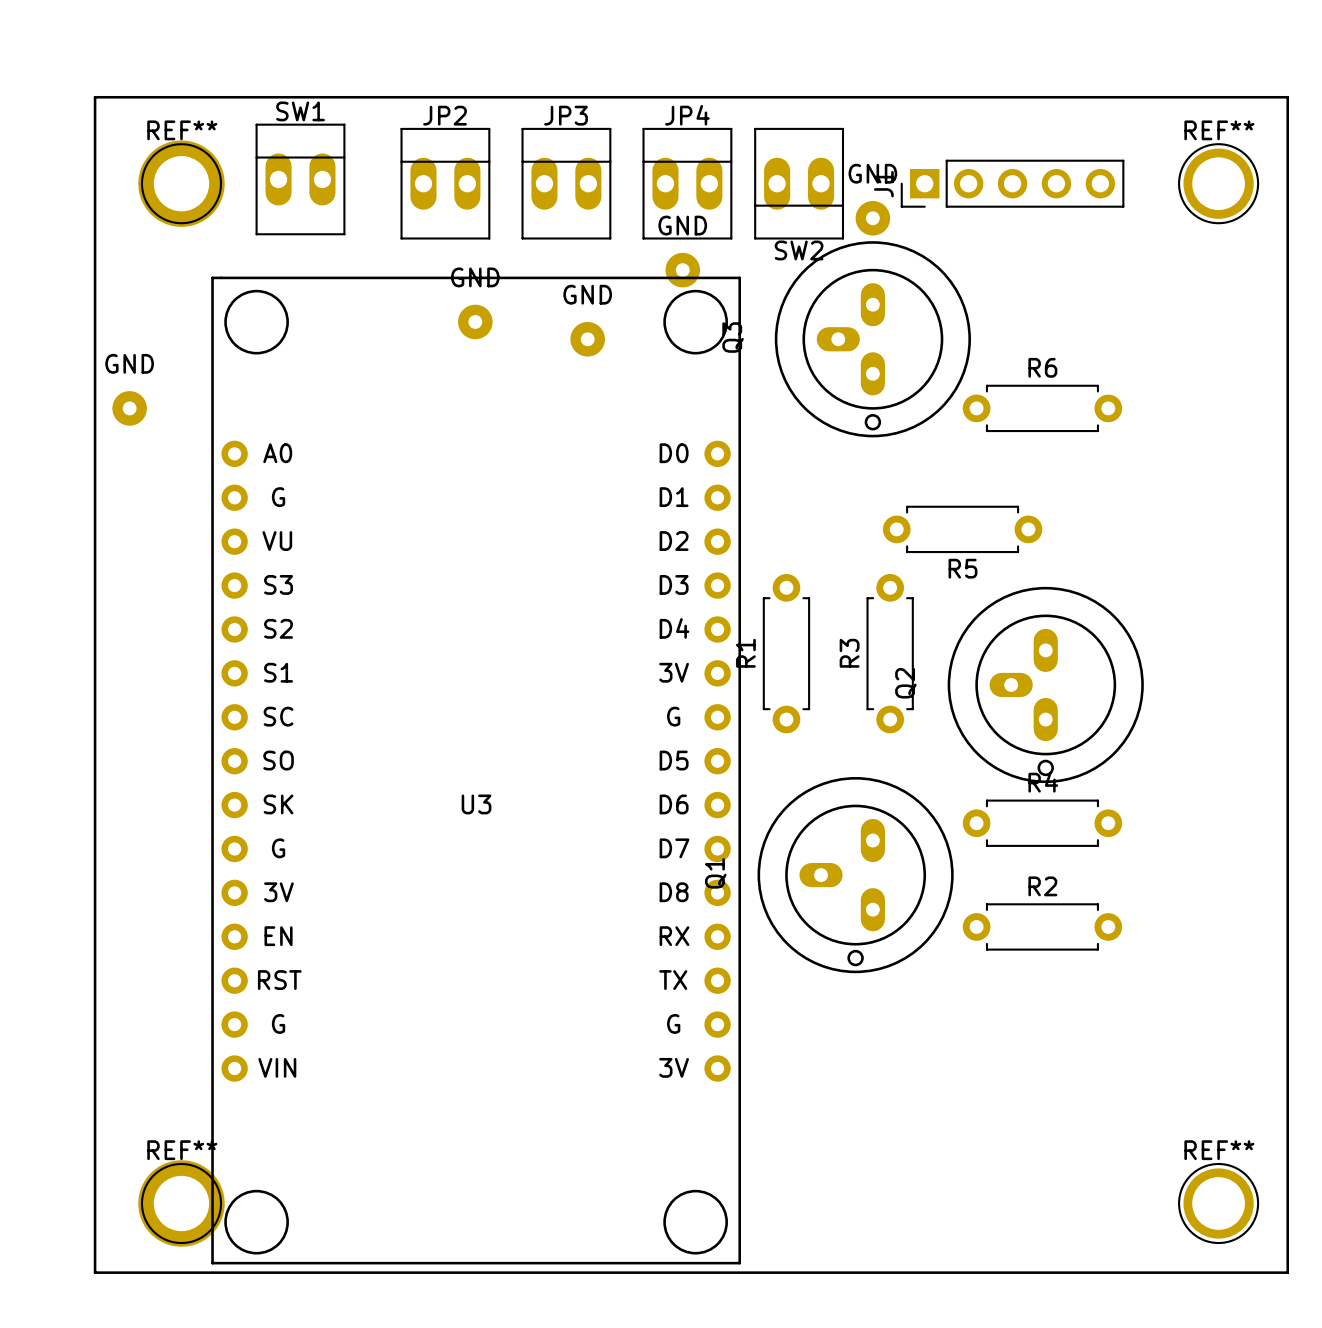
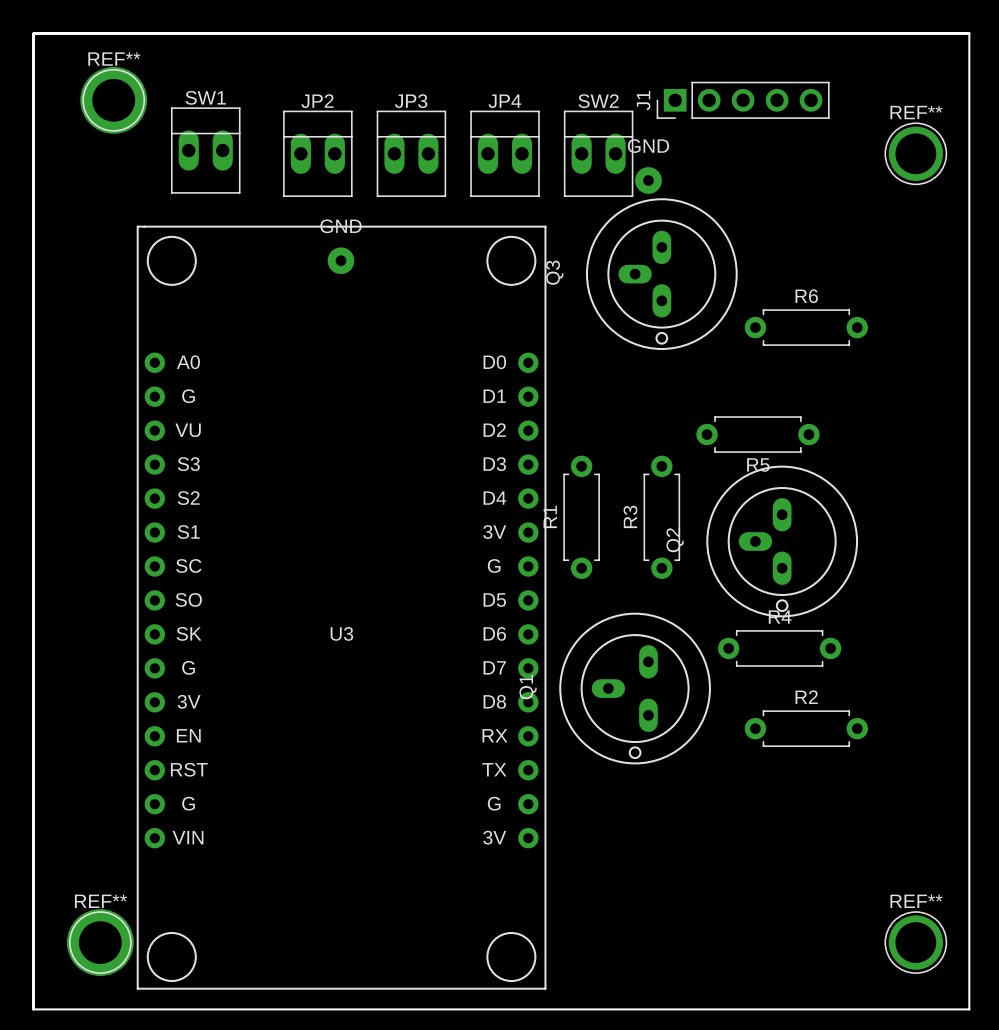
board edge: (1287, 97) (95, 97) (95, 1272) (1287, 1272) -> (969, 86) (969, 33) (33, 33) (33, 1009) (969, 1009) (969, 996)
REF** position: (181, 183) -> (113, 100)
SW2 rotation: 0° (799, 183) -> 180° (598, 153)
J1 position: (1012, 183) -> (743, 100)
GND: (682, 270) -> none
GND: (587, 339) -> none
Q3 position: (872, 339) -> (661, 274)
GND: (129, 408) -> none
R6 position: (1042, 408) -> (806, 327)
R5 position: (962, 529) -> (757, 434)
R2 position: (1042, 926) -> (806, 728)
REF** position: (181, 1203) -> (100, 942)

